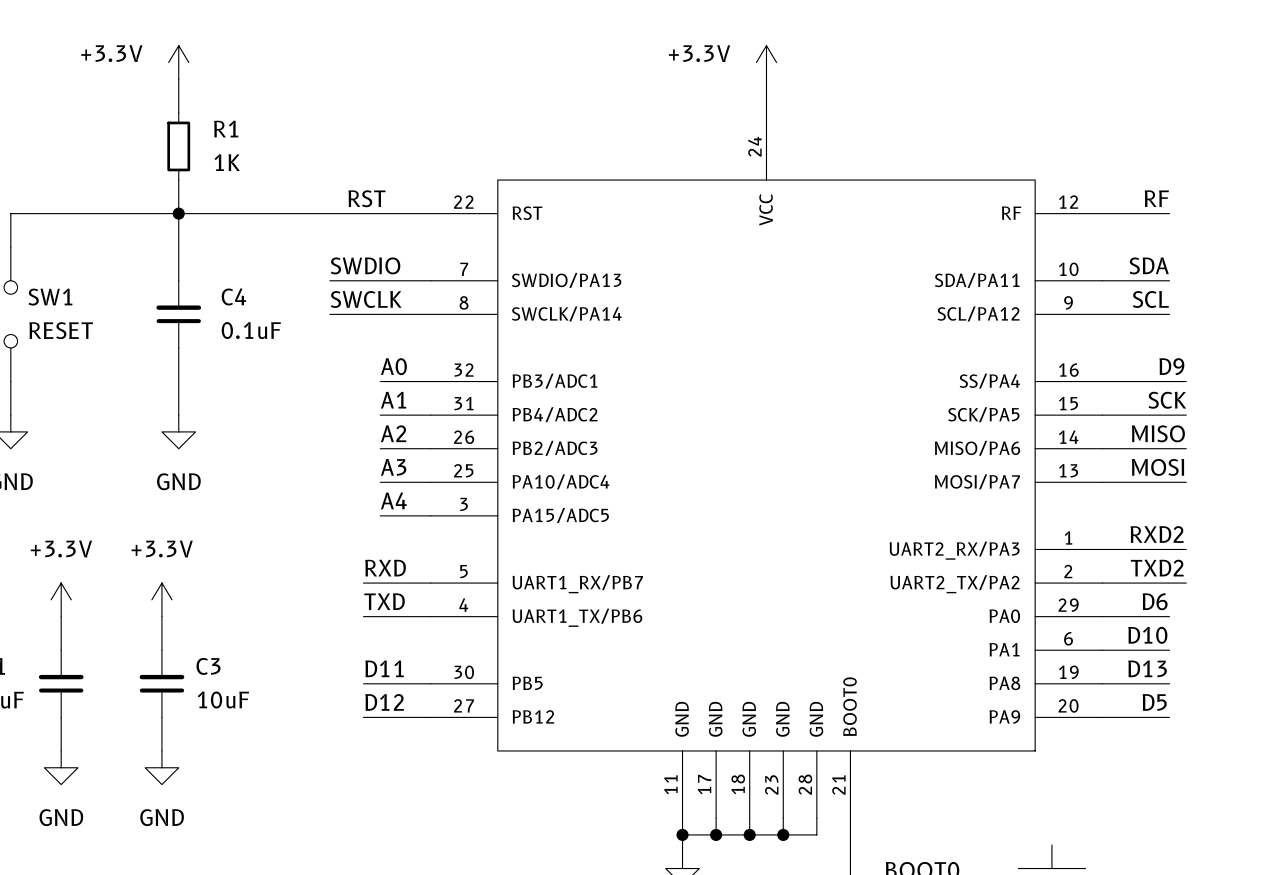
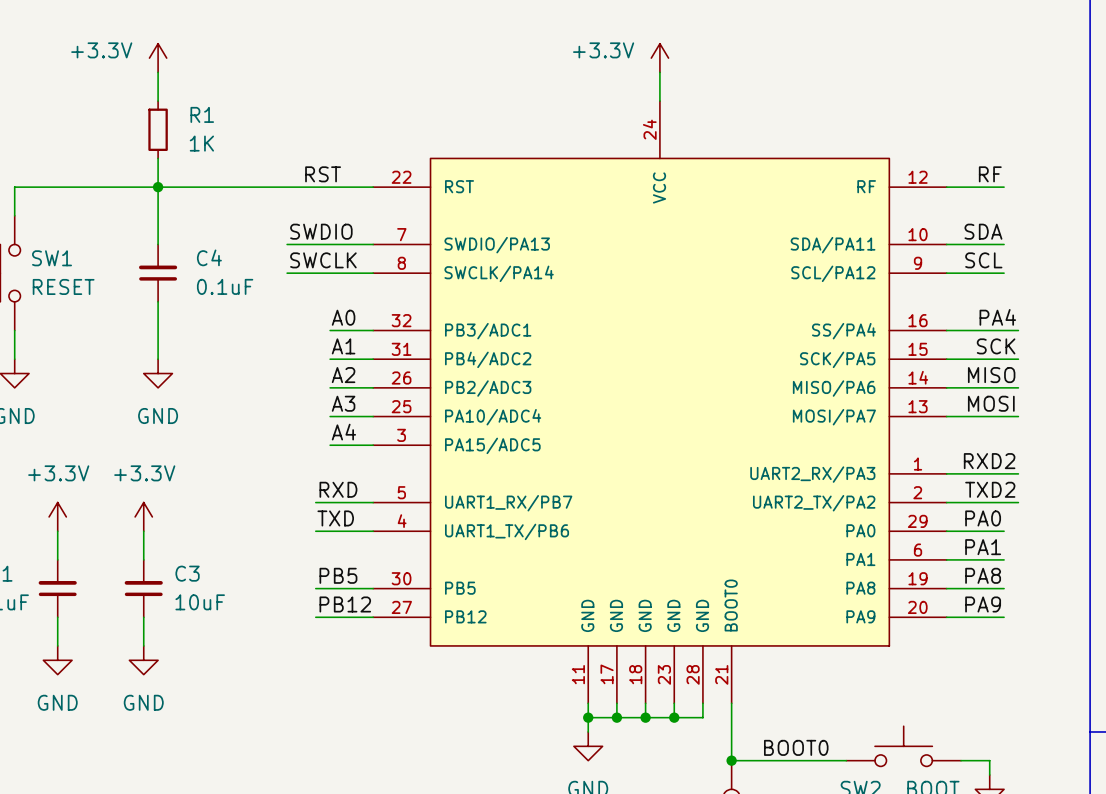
label: D9 (1171, 366) -> PA4 (997, 317)
label: D6 (1155, 601) -> PA0 (983, 518)
label: D10 (1147, 635) -> PA1 (983, 547)
label: D11 (384, 668) -> PB5 (338, 575)
label: D13 (1147, 668) -> PA8 (983, 575)
label: D12 (384, 702) -> PB12 (345, 604)
label: D5 (1154, 702) -> PA9 (983, 604)

